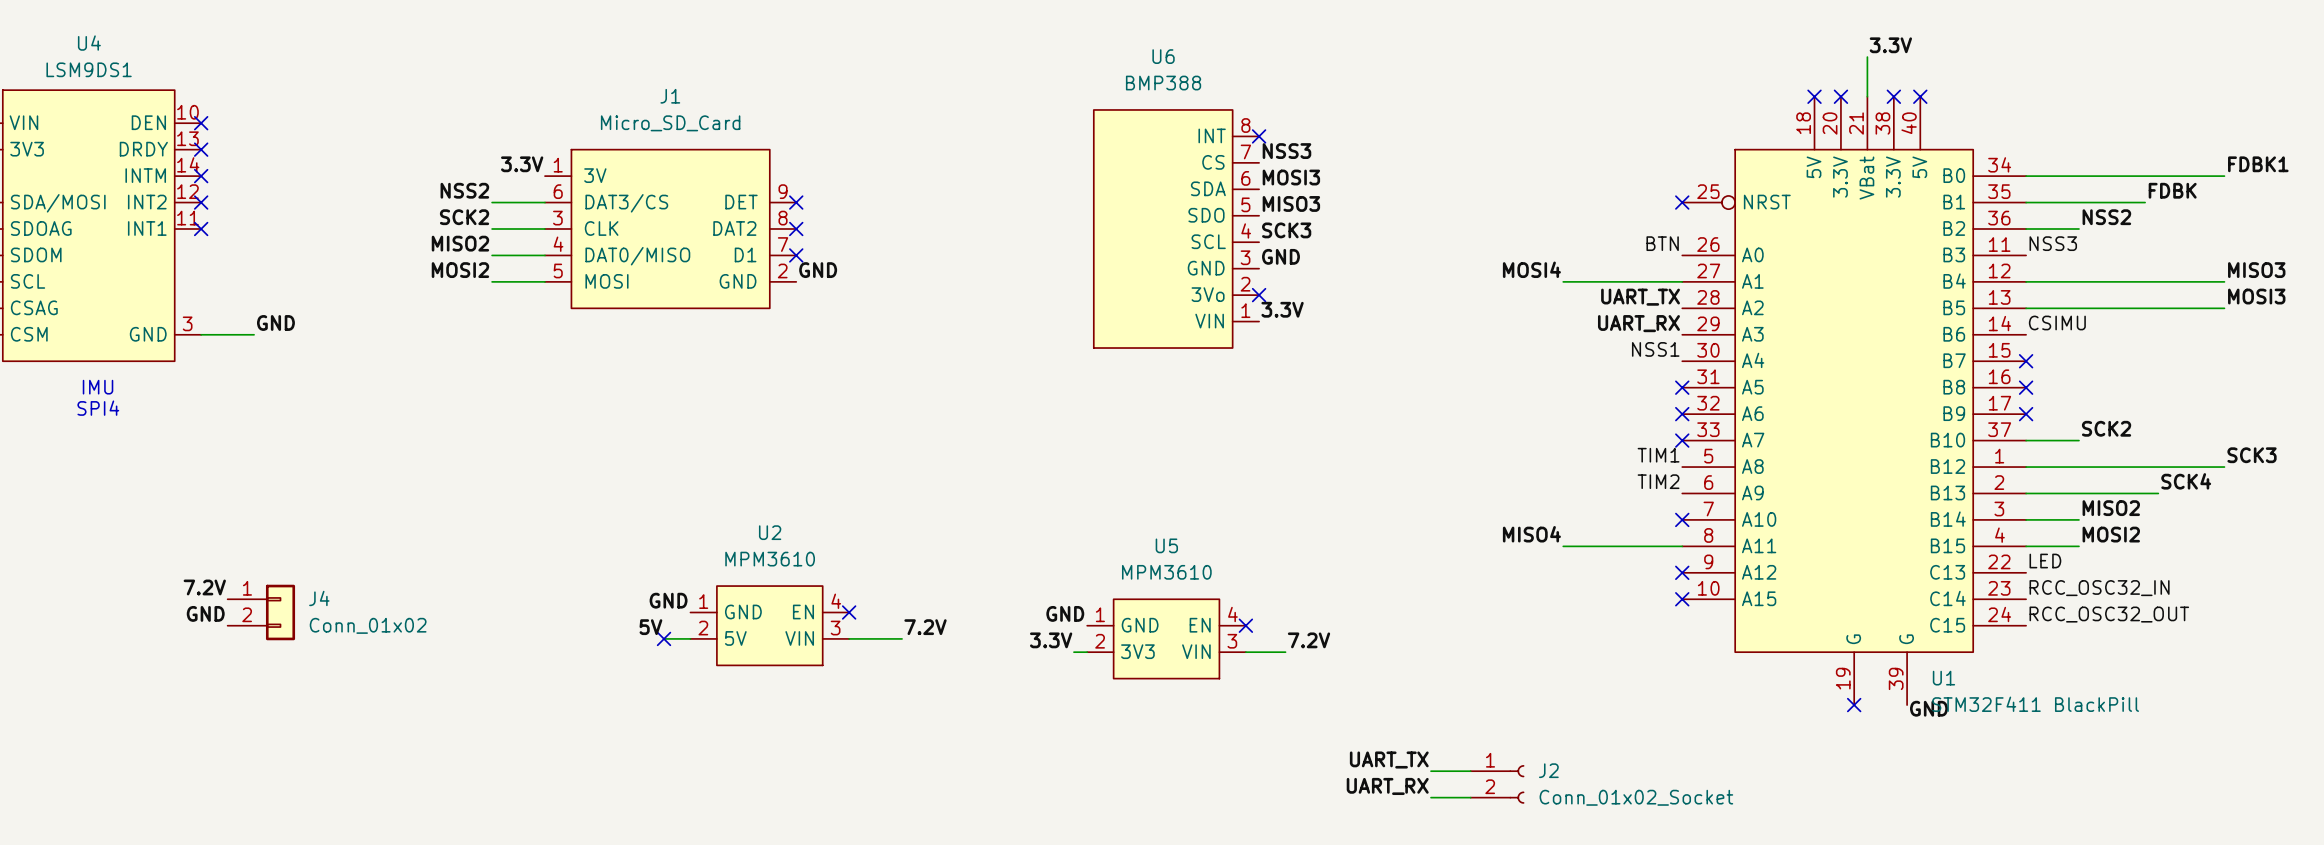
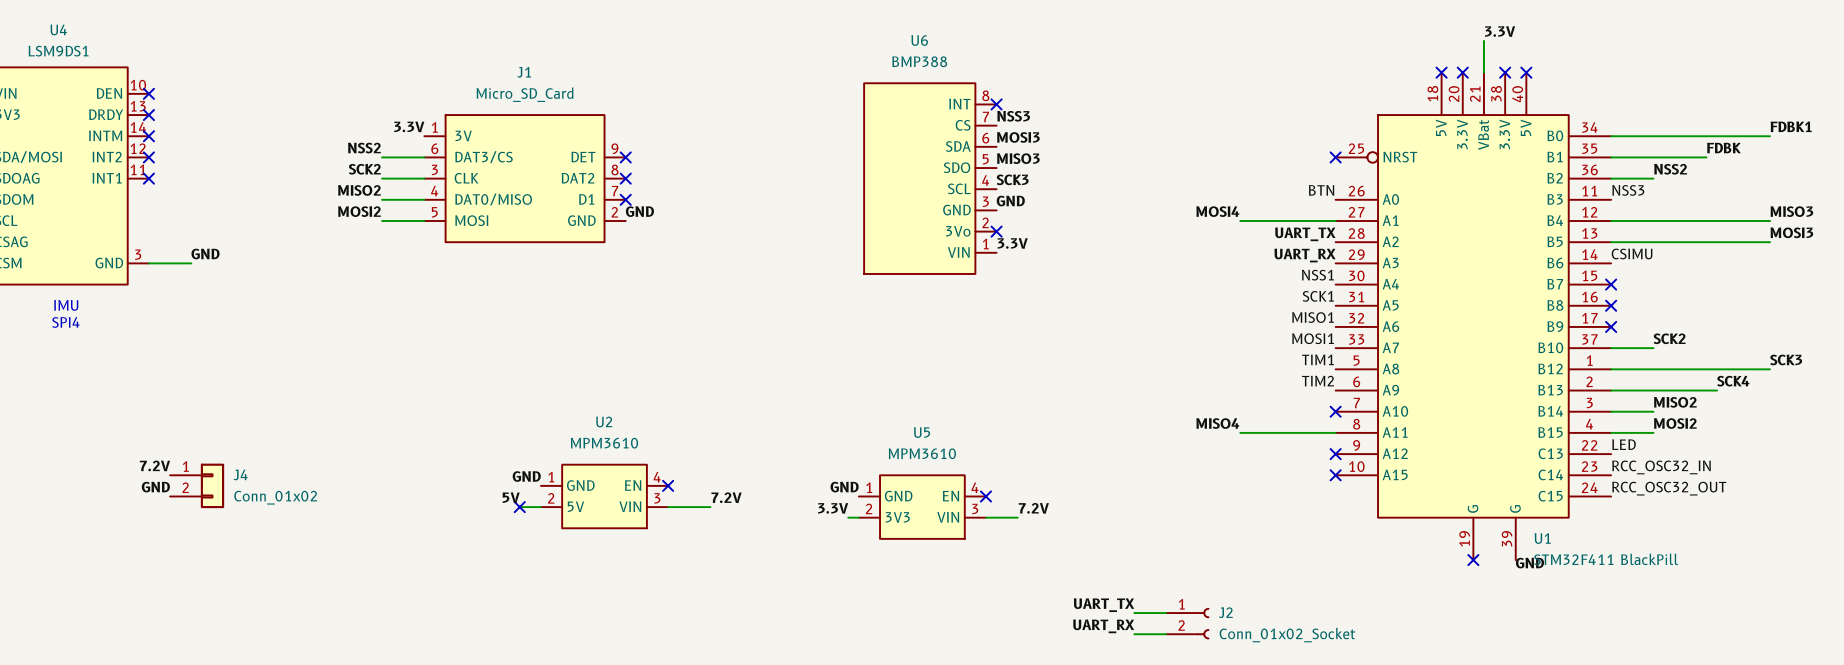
label: none -> SCK1 (1318, 296)
no-connect mark: (1682, 387) -> none
label: none -> MISO1 (1313, 317)
no-connect mark: (1682, 414) -> none
label: none -> MOSI1 (1313, 338)
no-connect mark: (1682, 440) -> none

